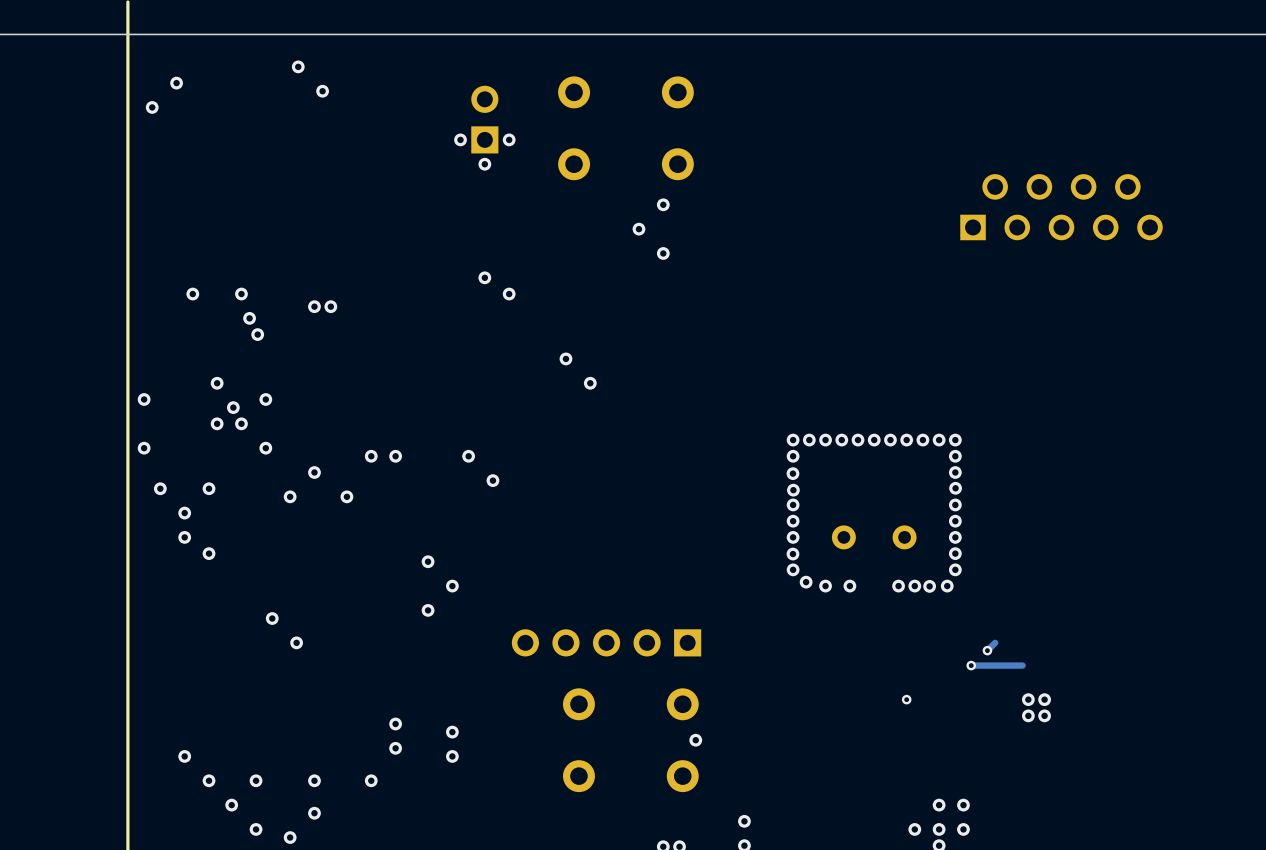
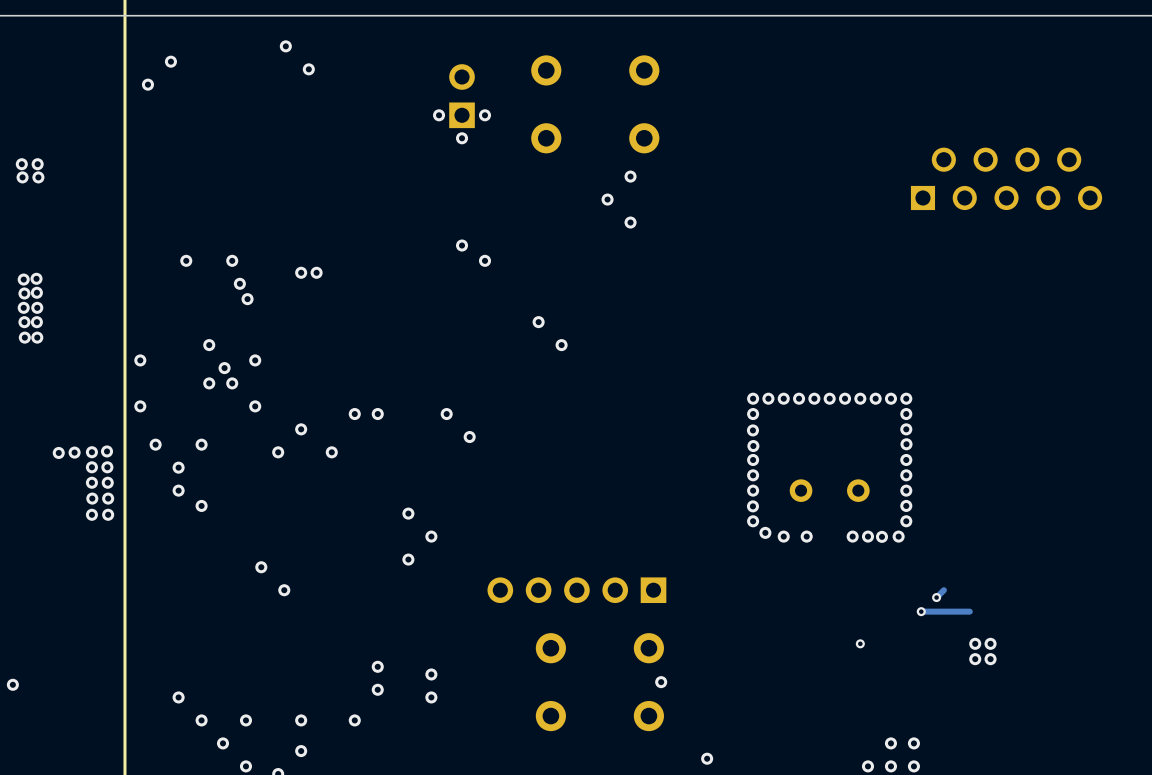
via: none -> (21, 164)
via: none -> (37, 164)
via: none -> (22, 177)
via: none -> (38, 177)
via: none -> (23, 279)
via: none -> (36, 278)
via: none -> (36, 292)
via: none -> (24, 293)
via: none -> (23, 307)
via: none -> (37, 307)
via: none -> (24, 322)
via: none -> (36, 322)
via: none -> (24, 337)
via: none -> (37, 337)
via: none -> (107, 451)
via: none -> (91, 452)
via: none -> (58, 452)
via: none -> (74, 452)
via: none -> (91, 467)
via: none -> (107, 467)
via: none -> (91, 482)
via: none -> (107, 482)
via: none -> (92, 498)
via: none -> (108, 498)
via: none -> (91, 514)
via: none -> (108, 514)
via: none -> (12, 684)

